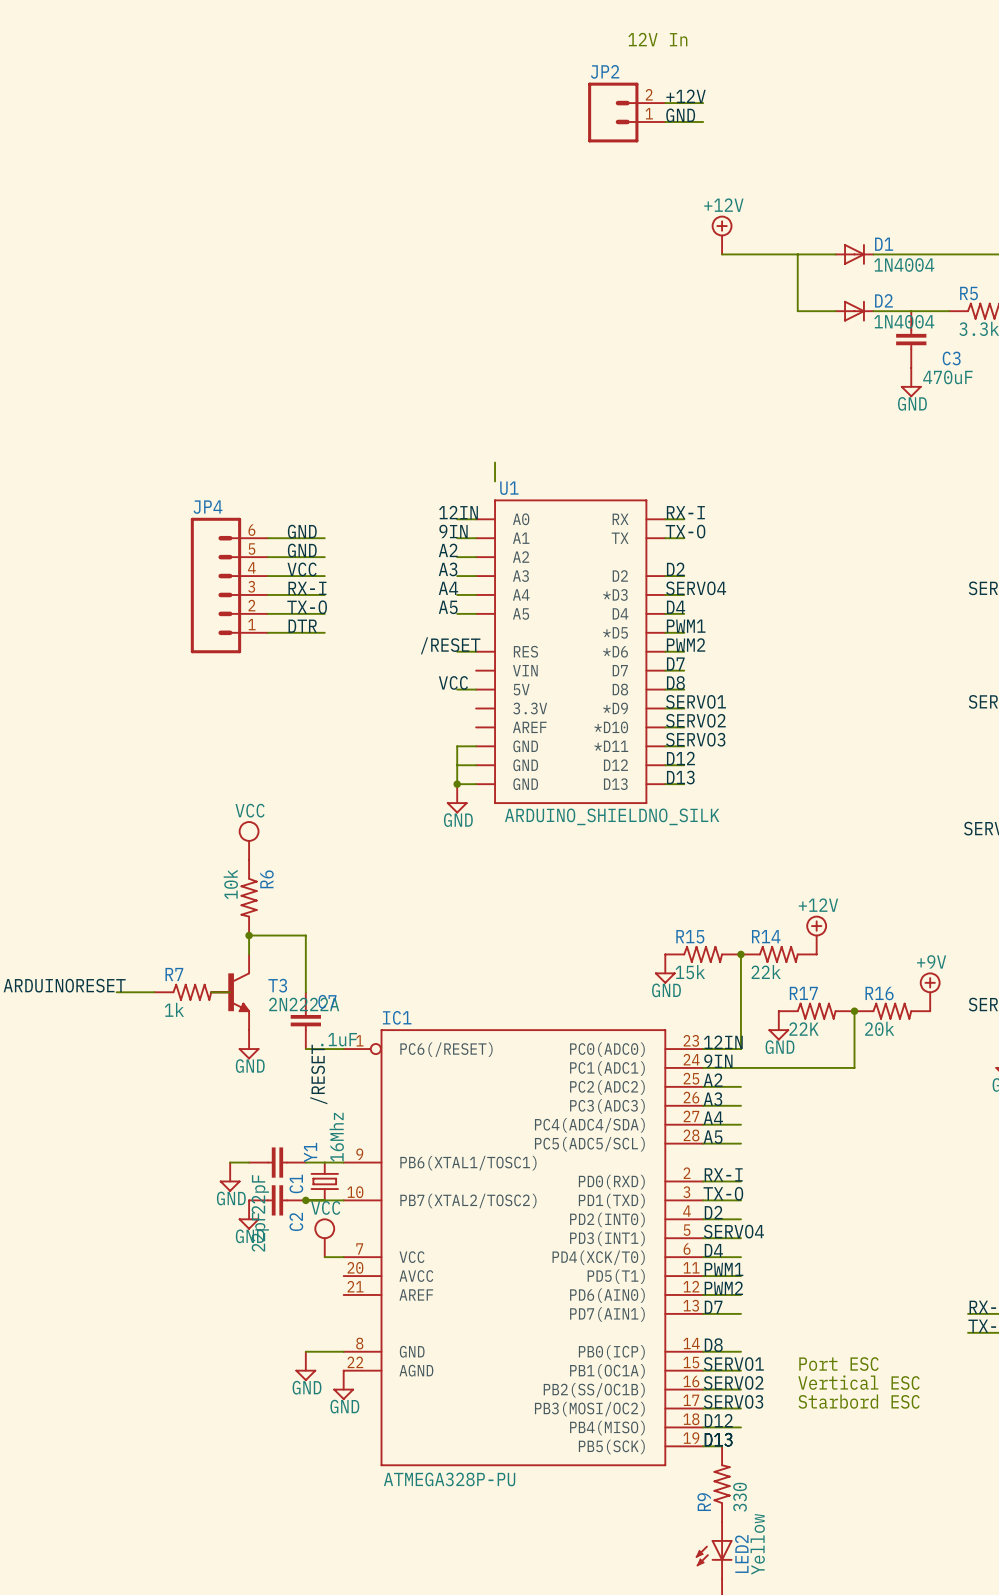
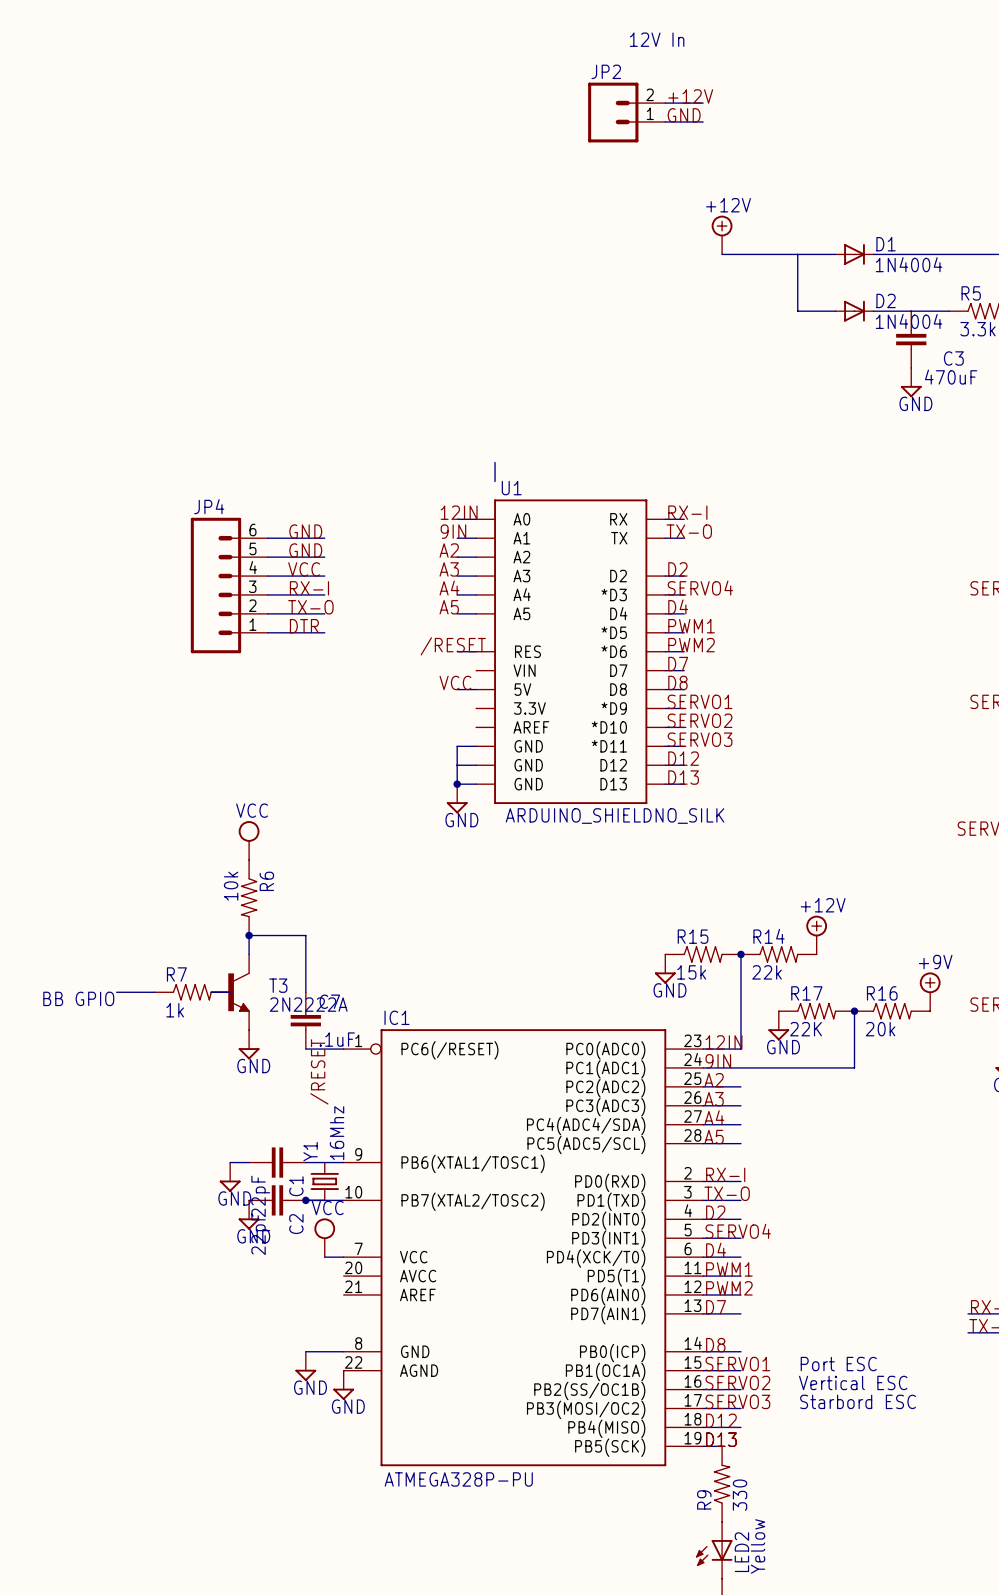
label: ARDUINORESET (64, 985) -> none
text: none -> BB GPIO (78, 998)

